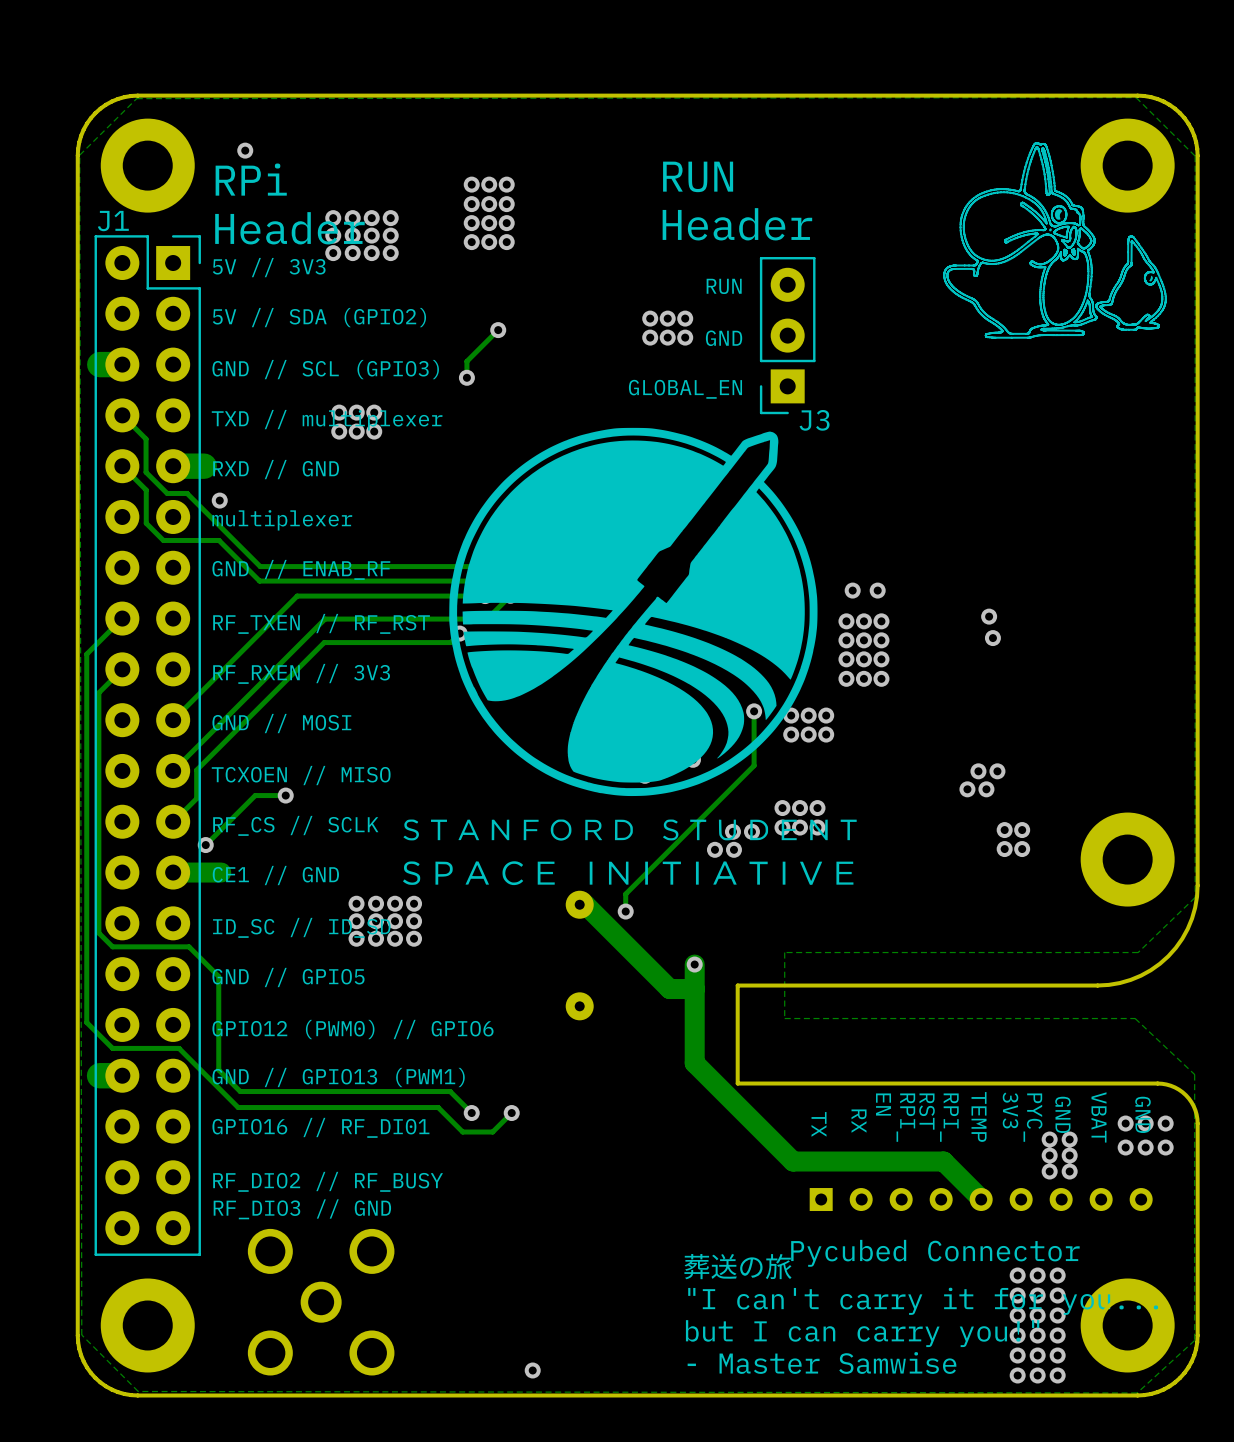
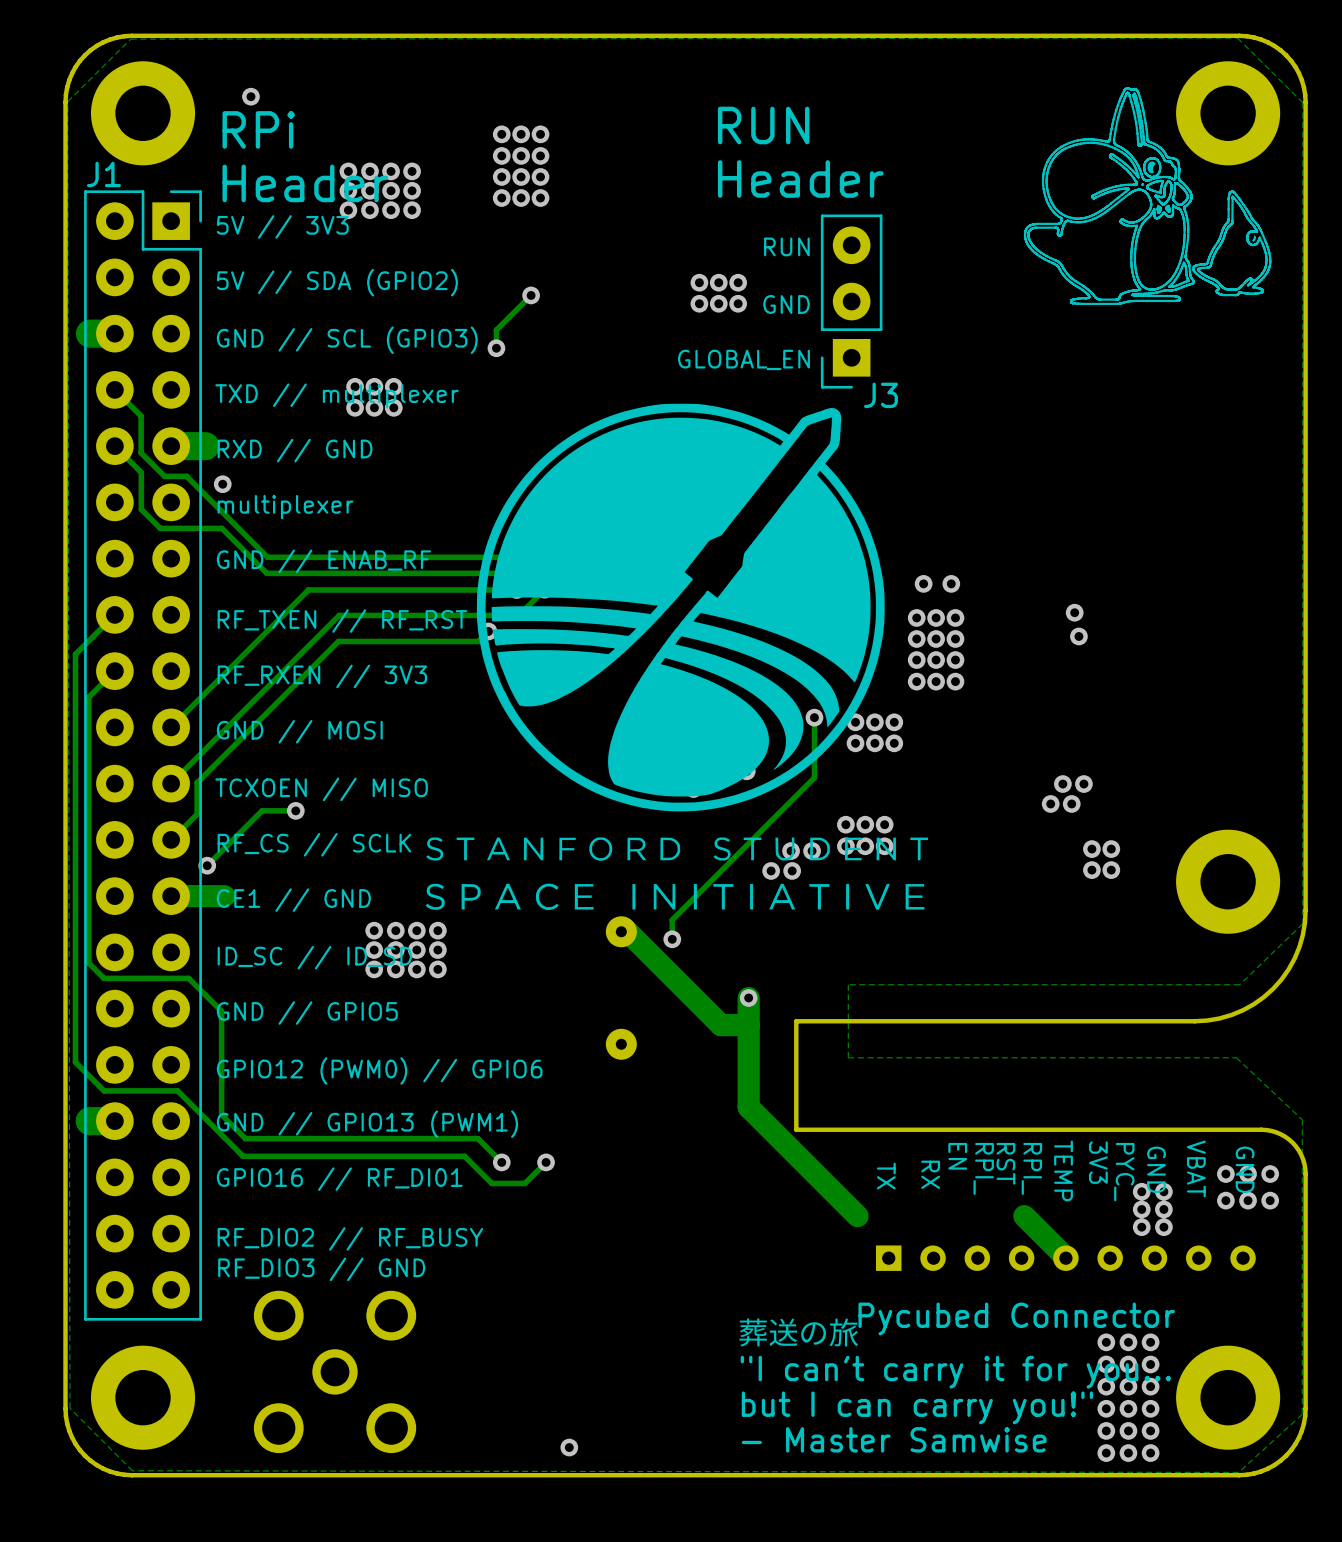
track: (943, 1161) (793, 1161) -> none

